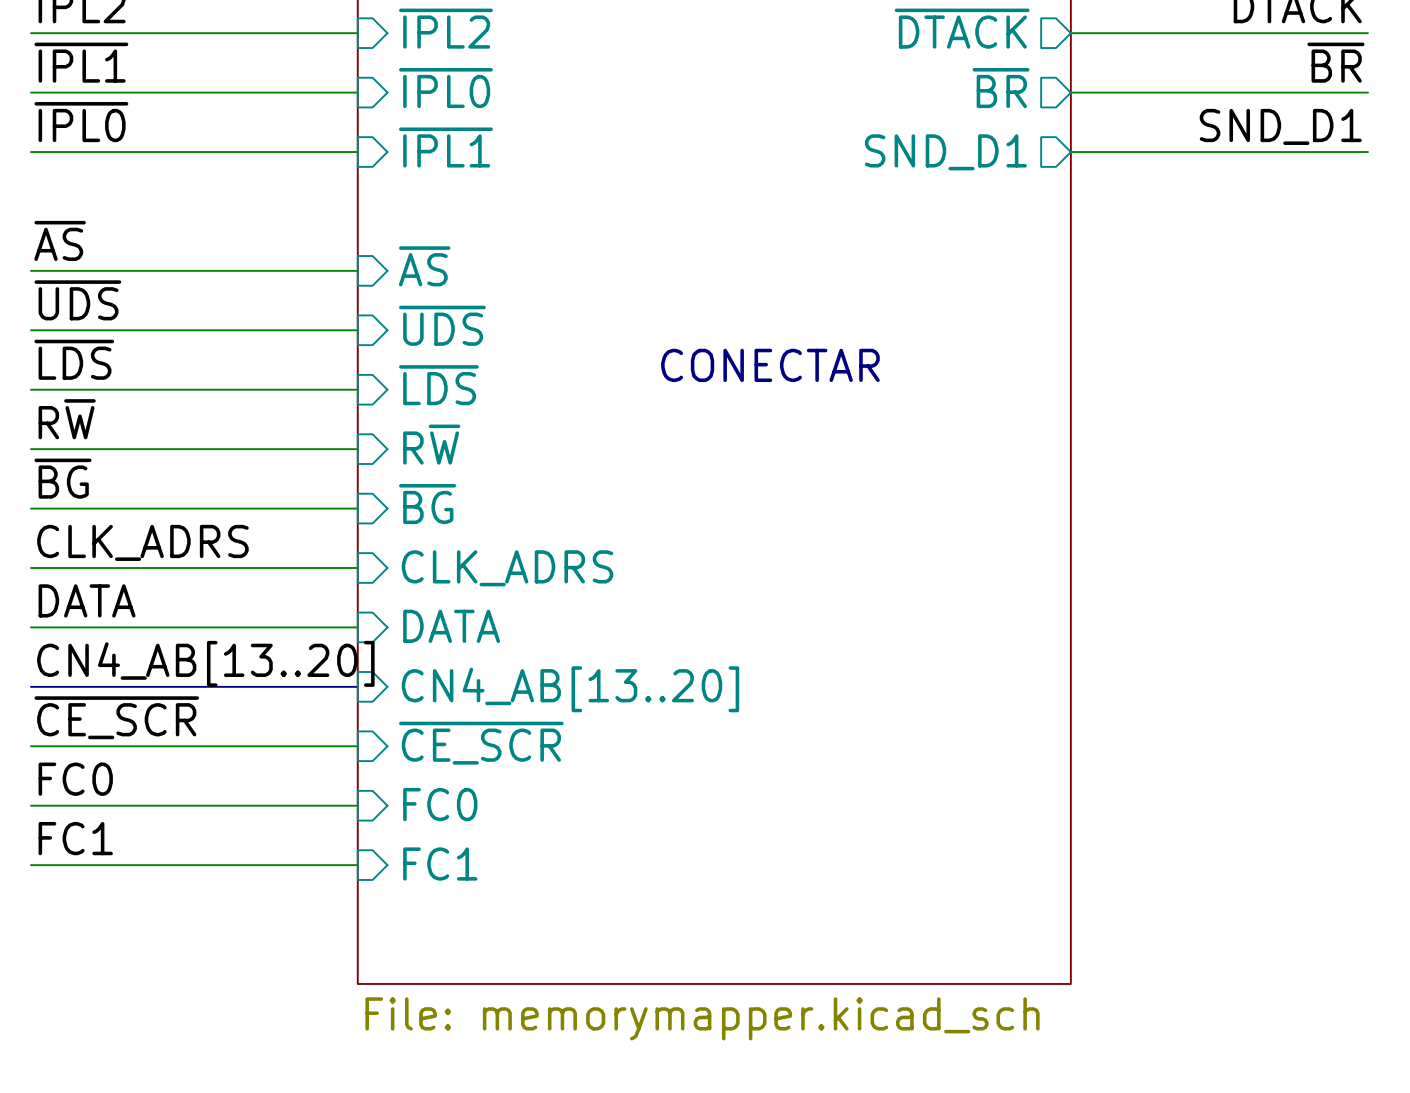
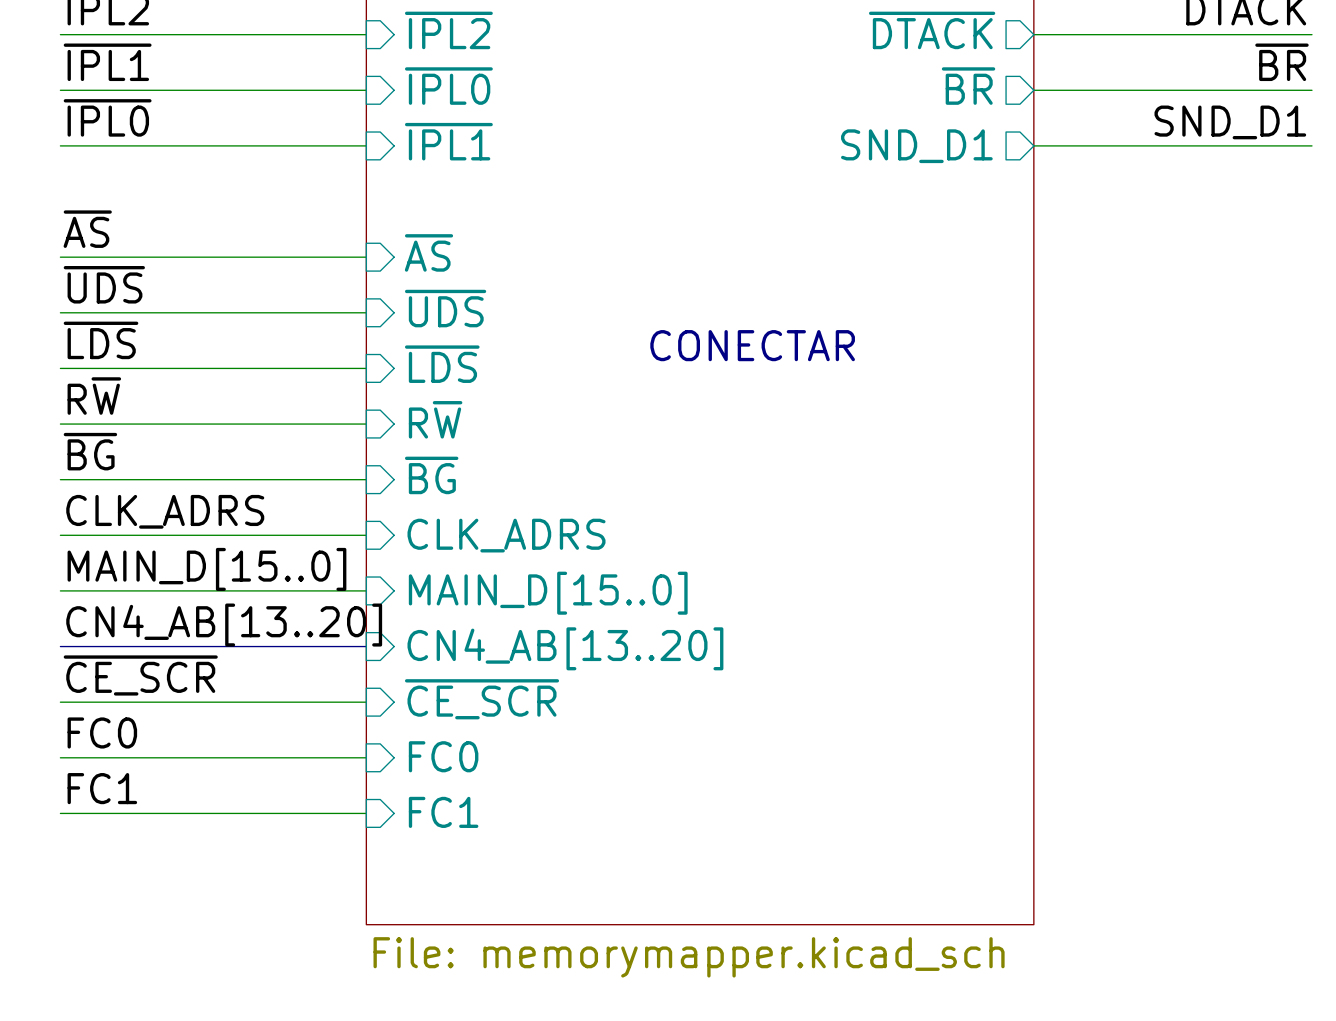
label: DATA (87, 600) -> MAIN_D[15..0] (206, 569)
sheet pin: DATA (451, 626) -> MAIN_D[15..0] (548, 593)

